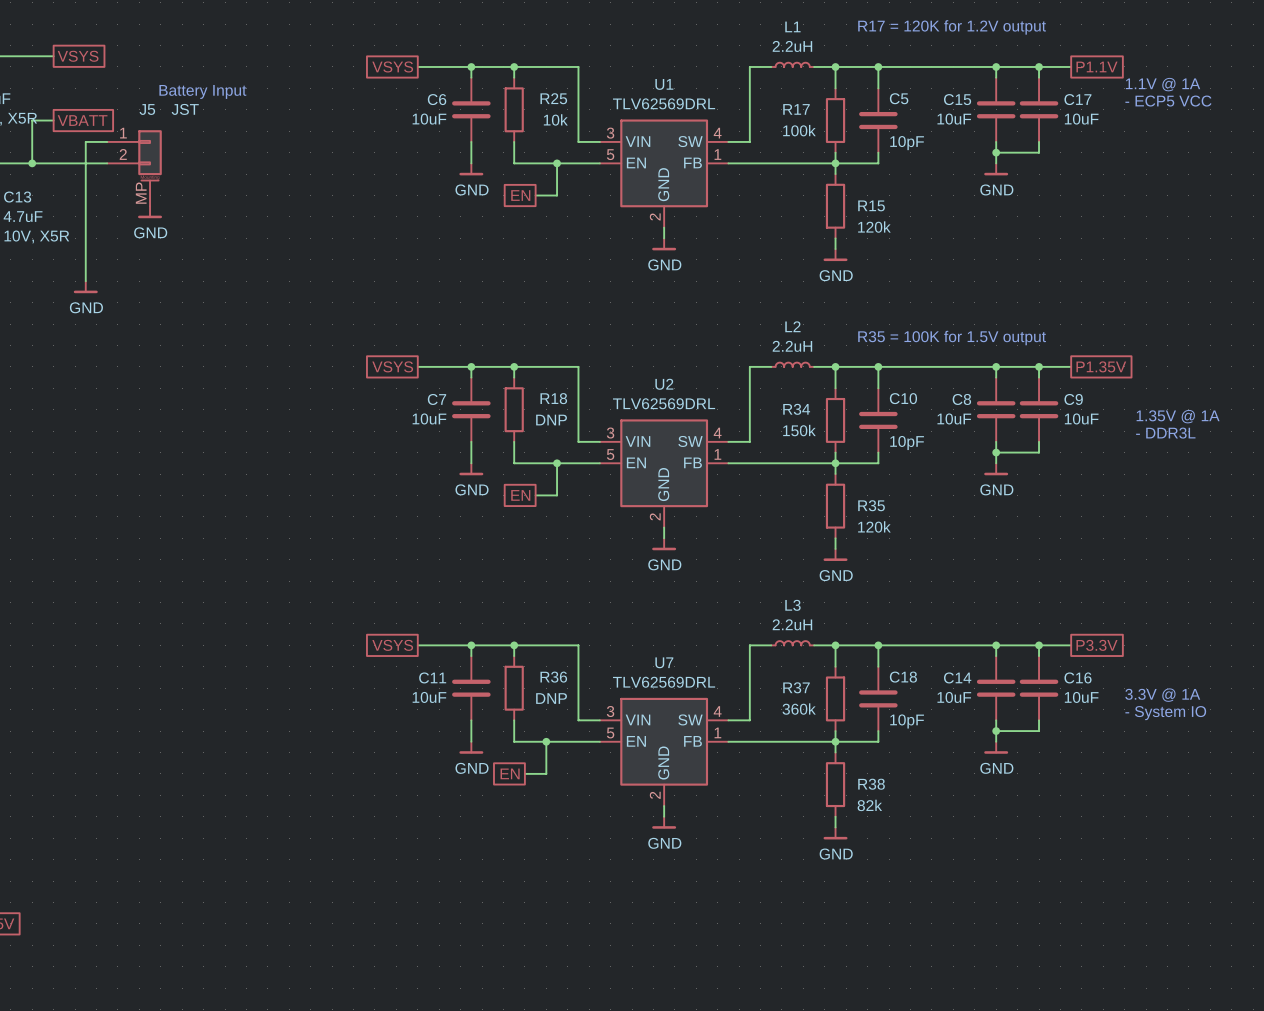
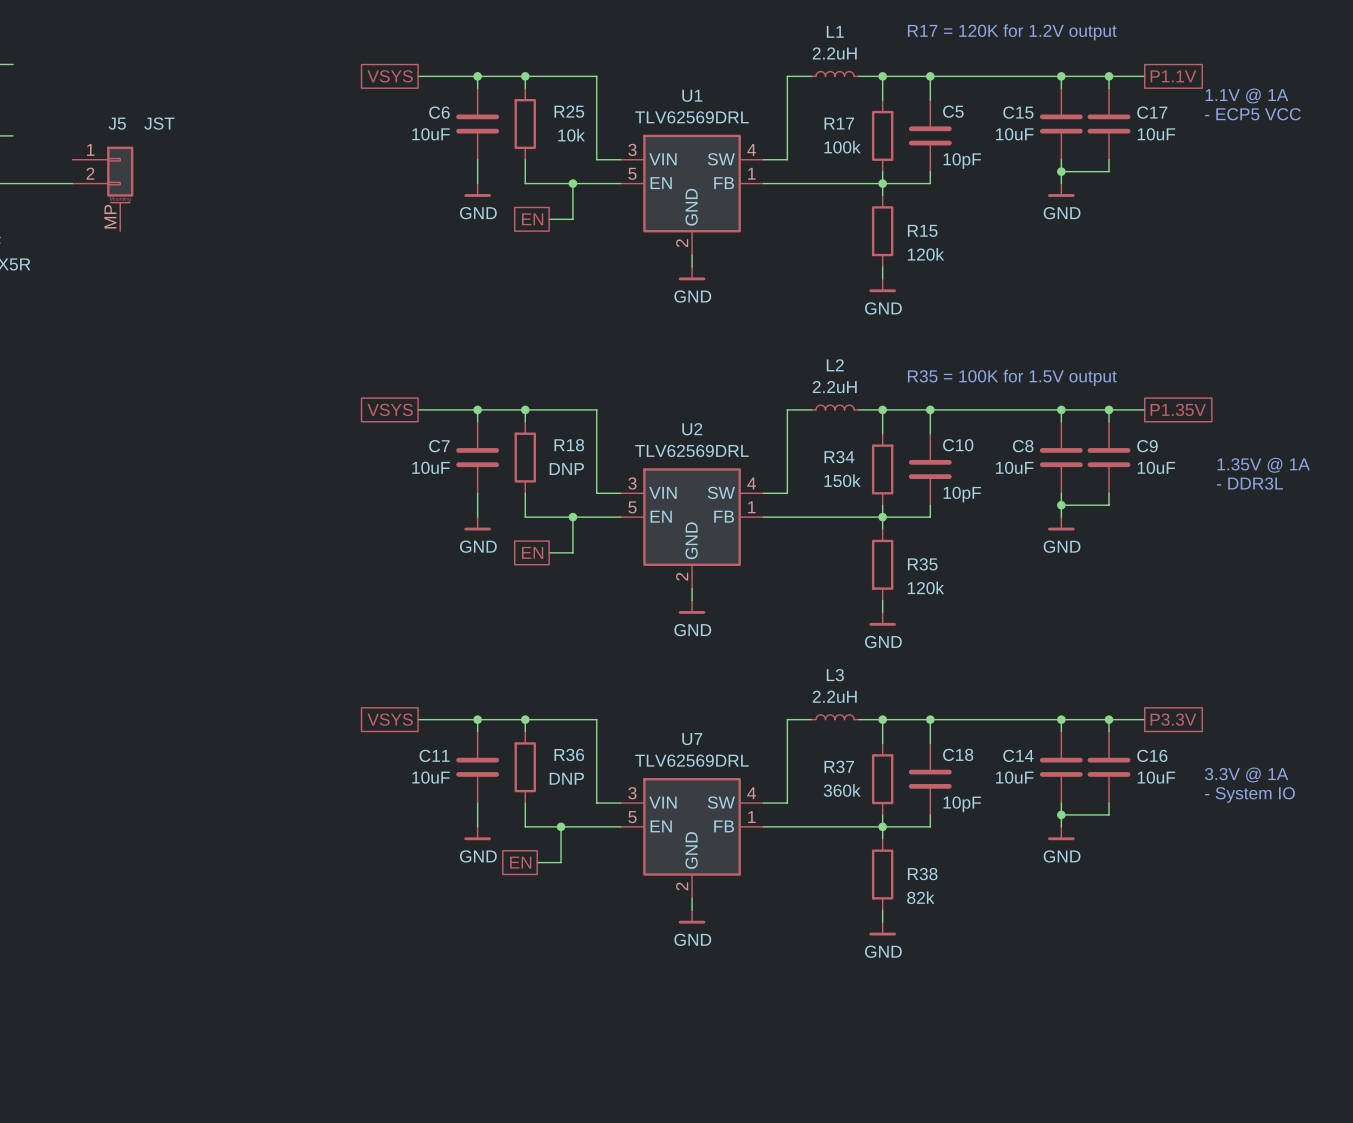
global label: VSYS (78, 56) -> none
text: Battery Input (202, 91) -> none
global label: VBATT (82, 120) -> none
wire: (107, 141) (85, 141) (85, 281) -> none
power symbol: GND (150, 212) -> none
power symbol: GND (85, 287) -> none

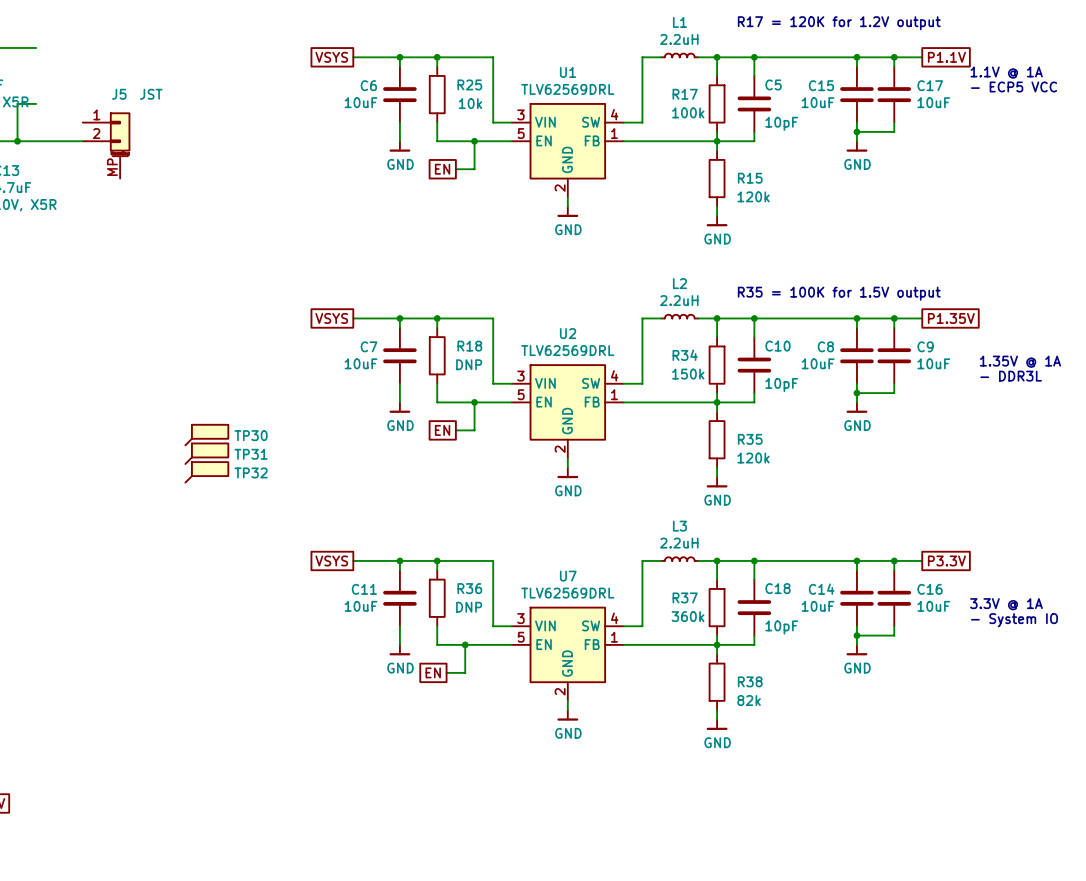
TP30: none -> (206, 435)
TP31: none -> (206, 453)
TP32: none -> (206, 472)

